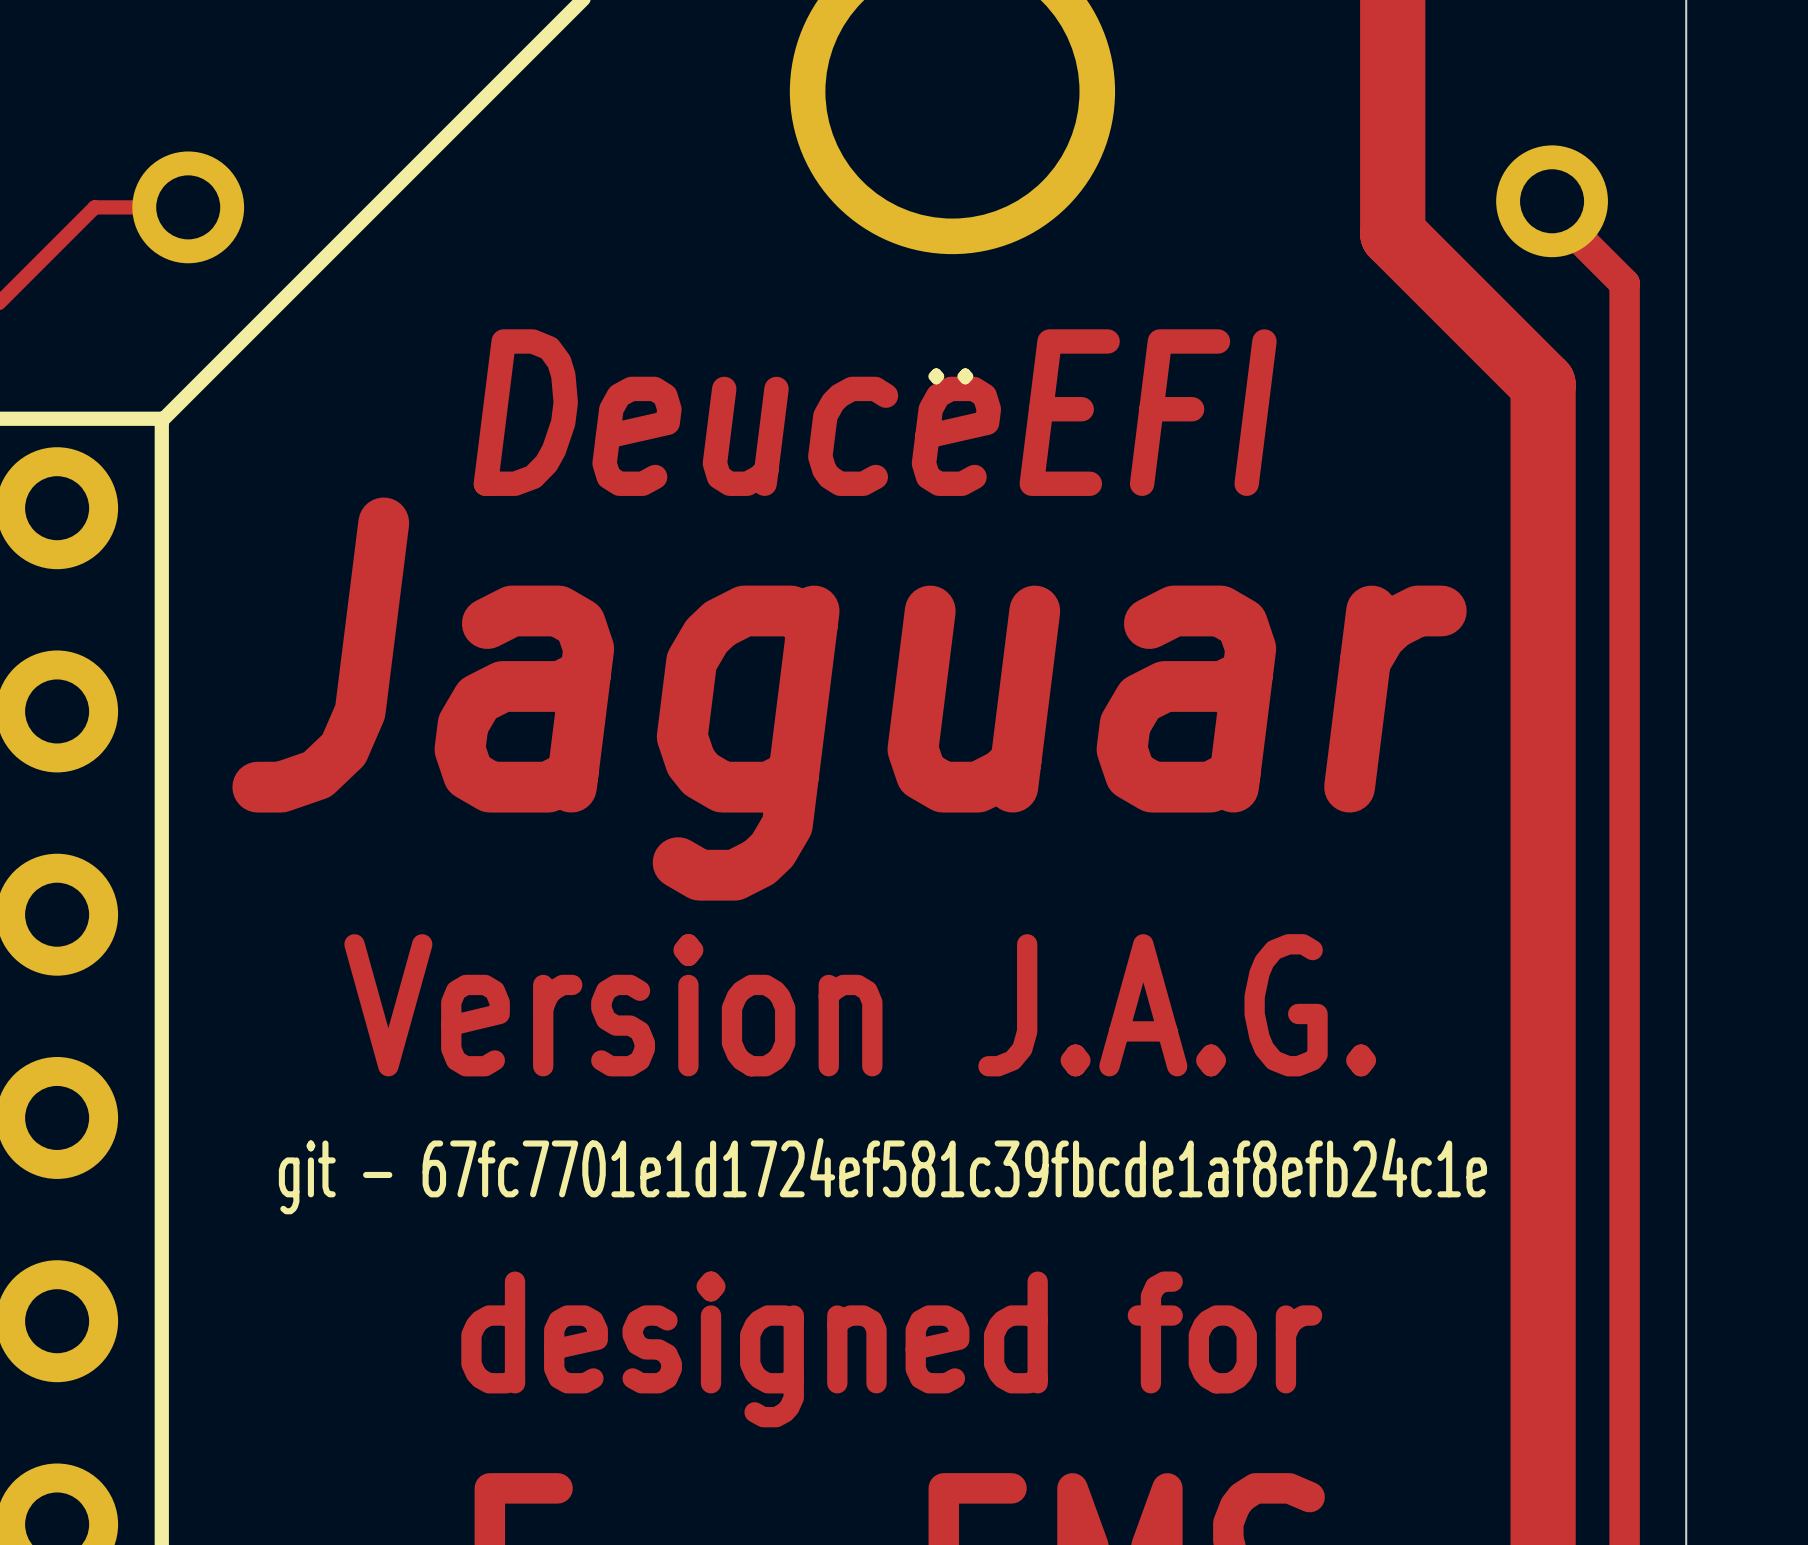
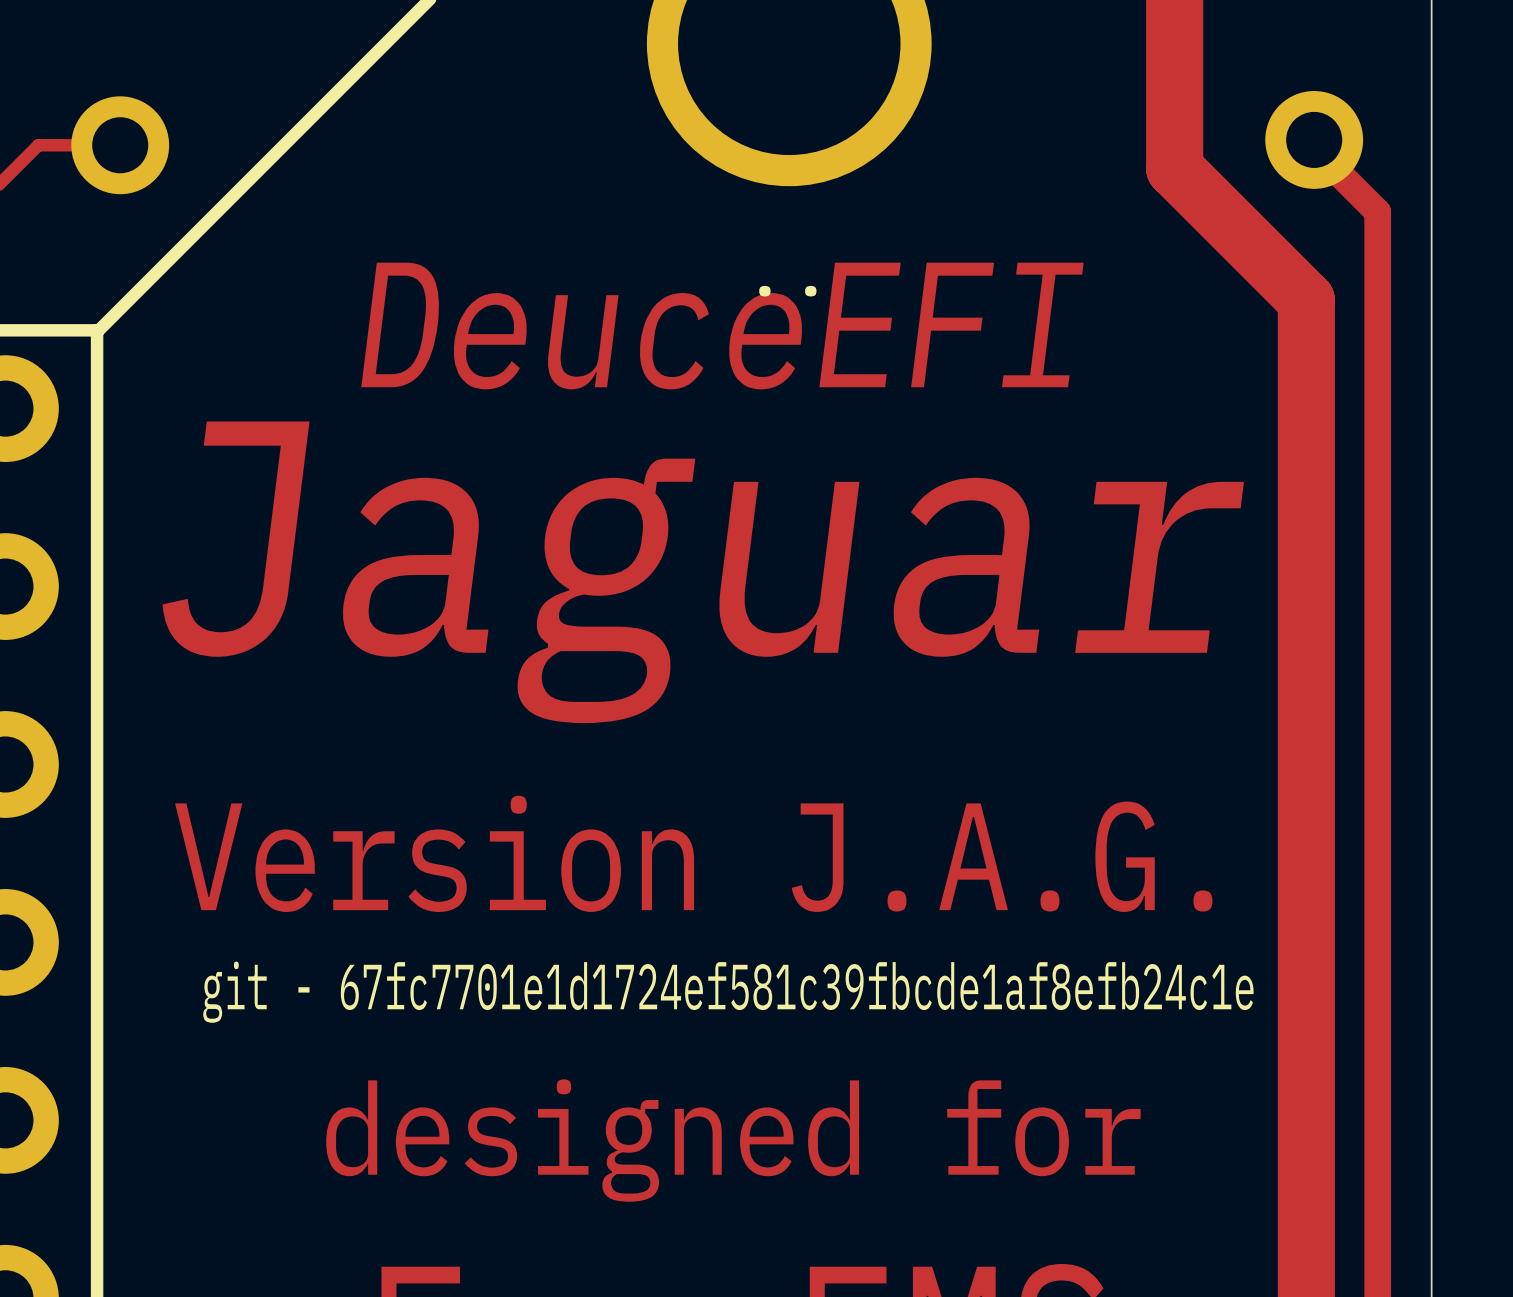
text position: Version J.A.G. (860, 1005) -> Version J.A.G. (693, 853)

